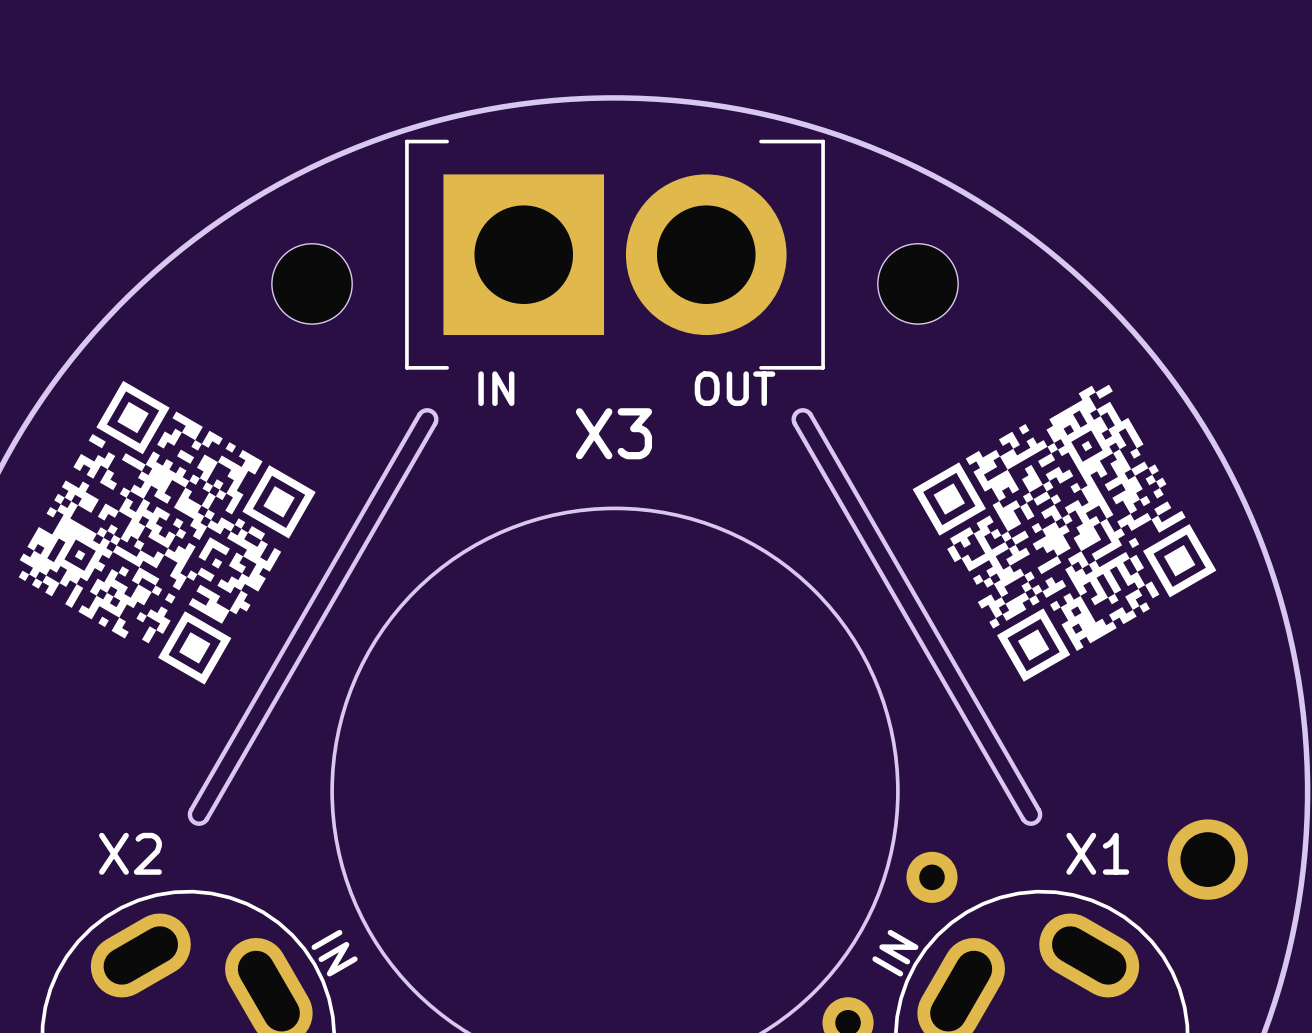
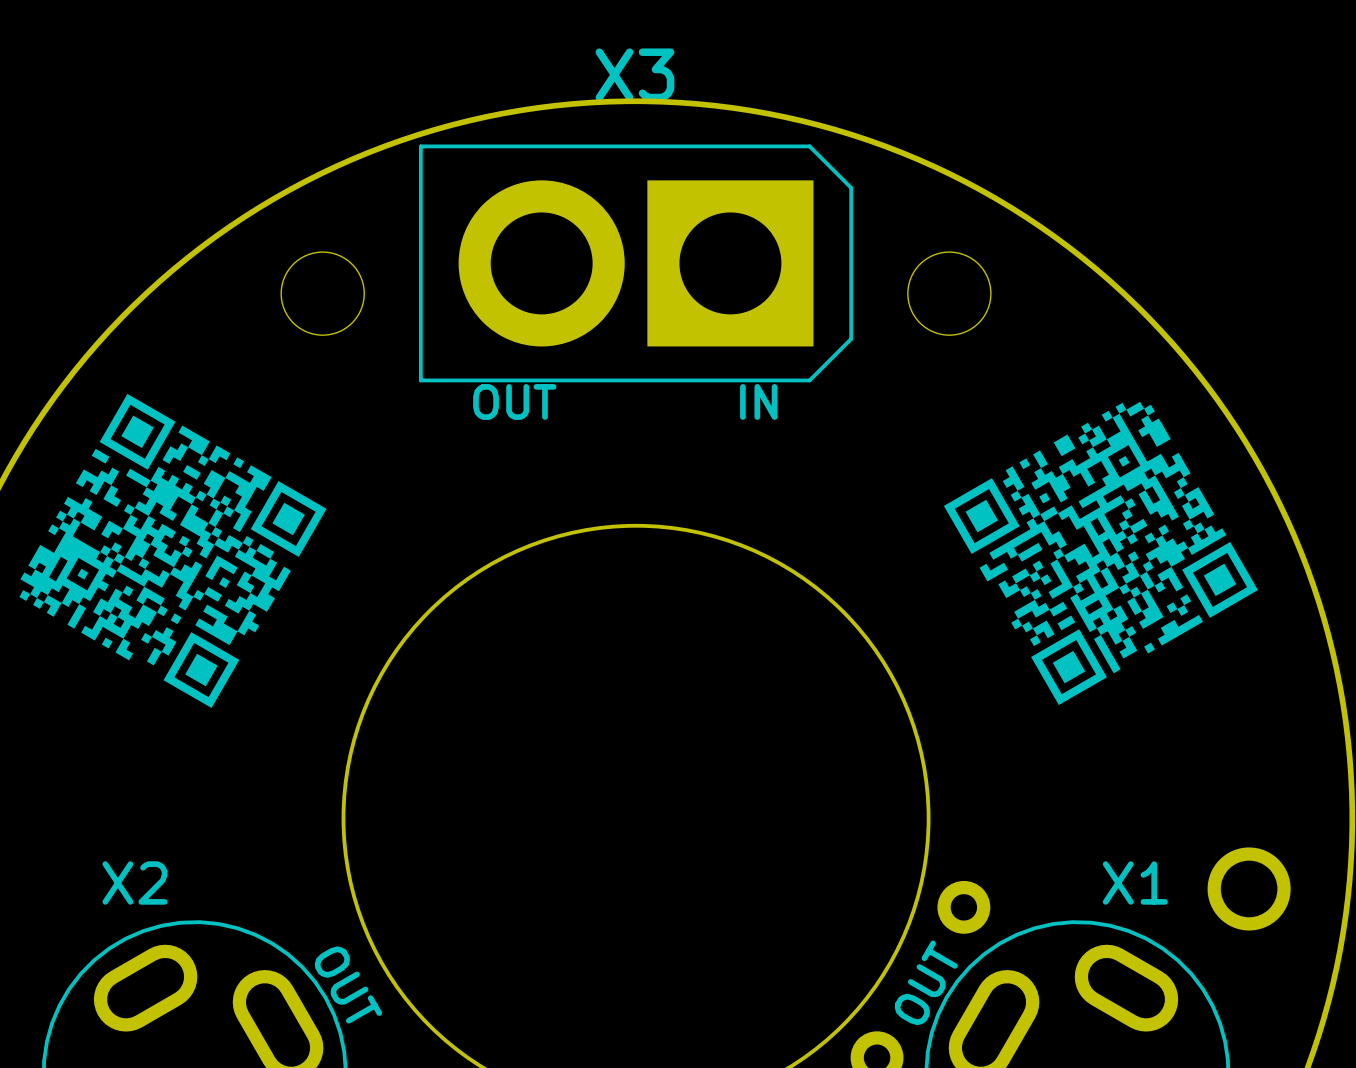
X3 footprint: [405, 139, 825, 370] -> [418, 144, 854, 383]
drawing shape: [912, 384, 1217, 682] -> [943, 401, 1258, 706]
text: IN (496, 388) -> OUT (514, 401)
text: OUT (735, 388) -> IN (758, 401)
X3 name position: X3 (613, 433) -> X3 (634, 74)
part: (313, 616) -> none
part: (916, 616) -> none
text: IN (334, 953) -> OUT (348, 984)
text: IN (895, 953) -> OUT (926, 982)

